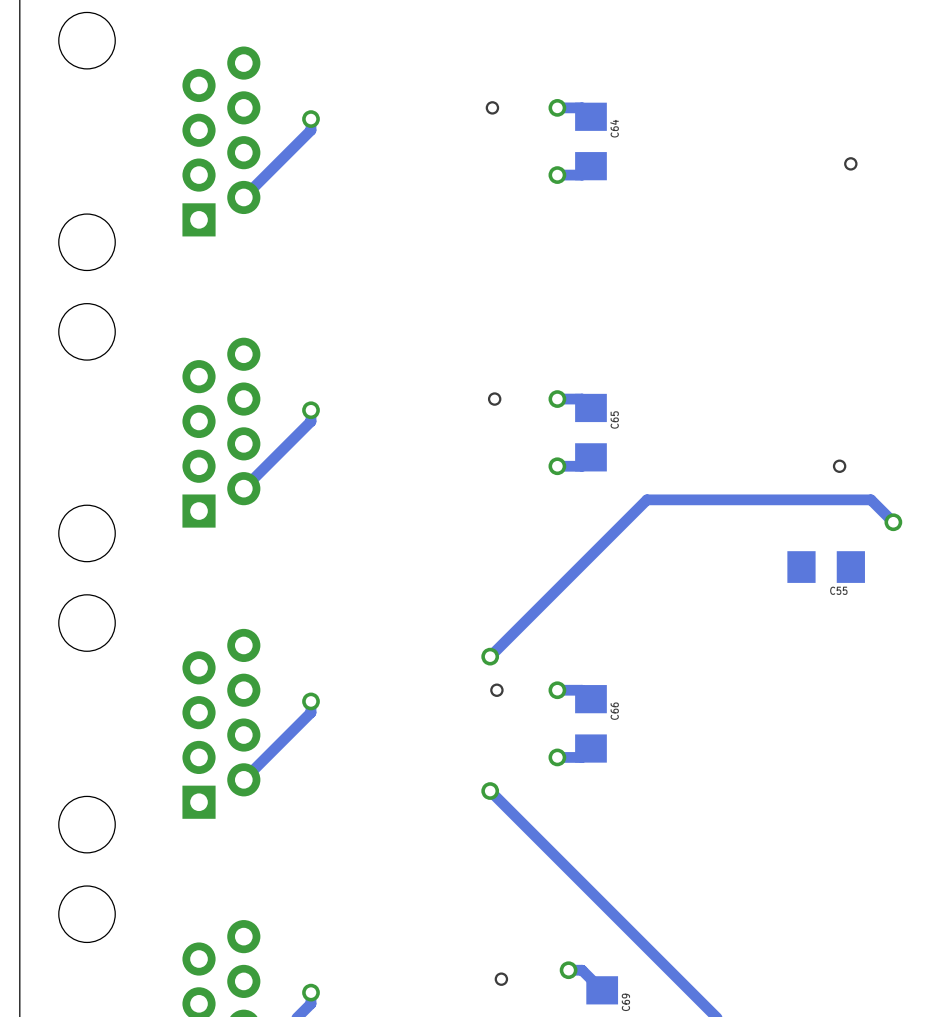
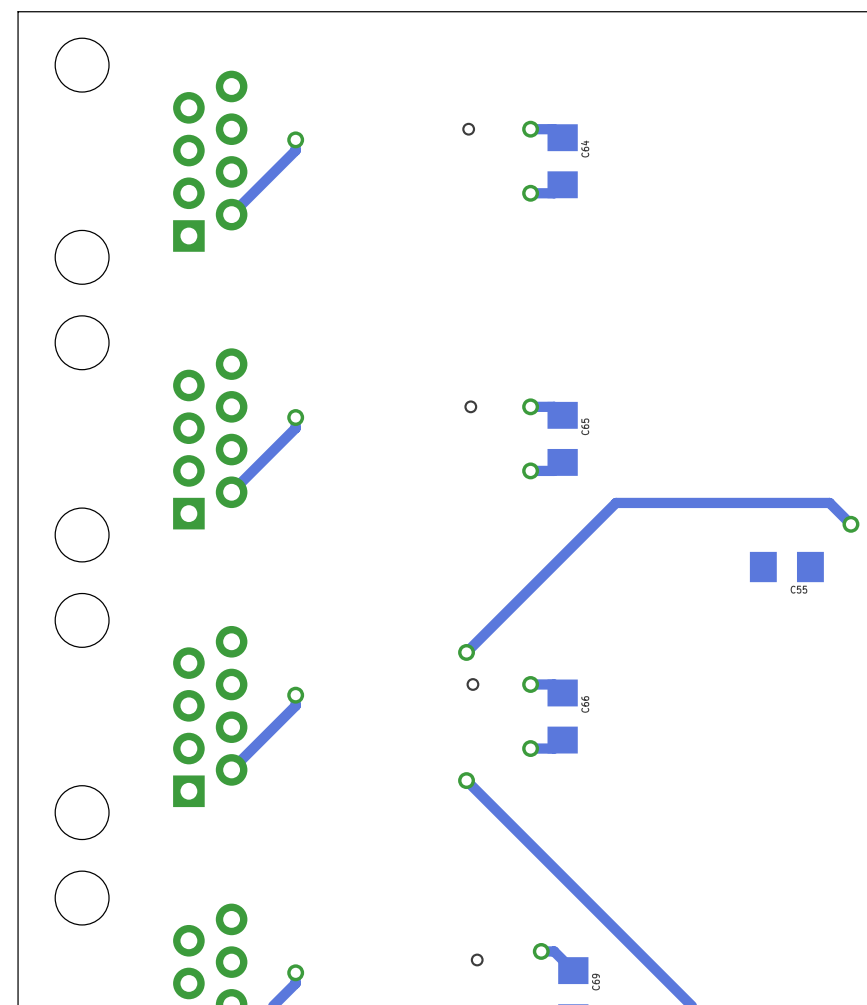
part: (850, 163) -> none
part: (839, 466) -> none

